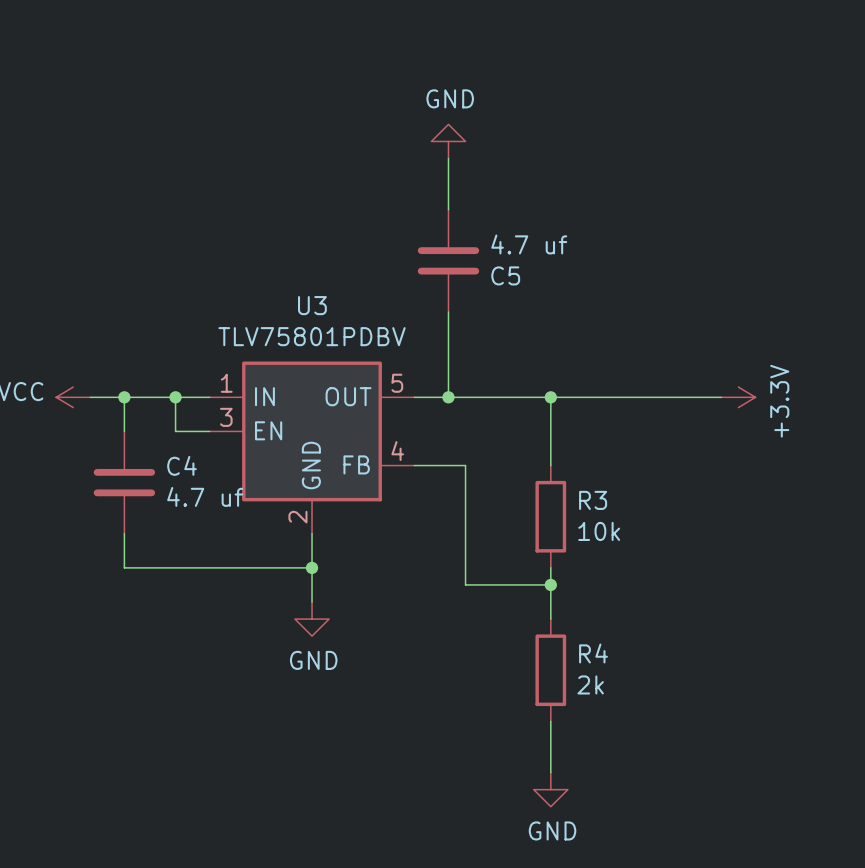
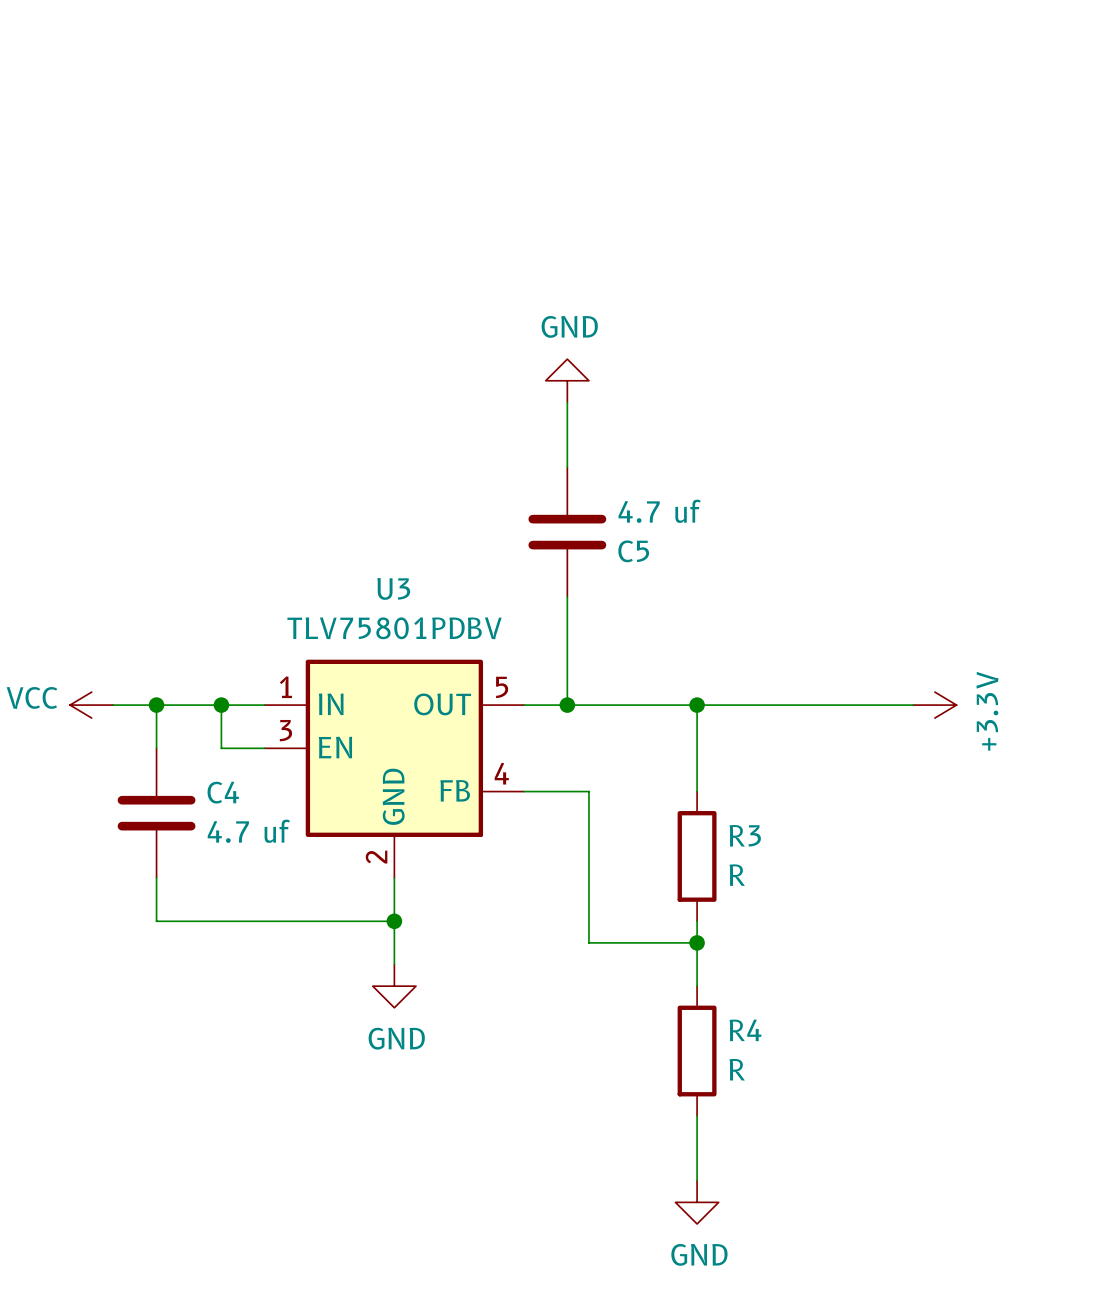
R3 value: 10k (599, 531) -> R (737, 875)
R4 value: 2k (590, 684) -> R (737, 1069)

